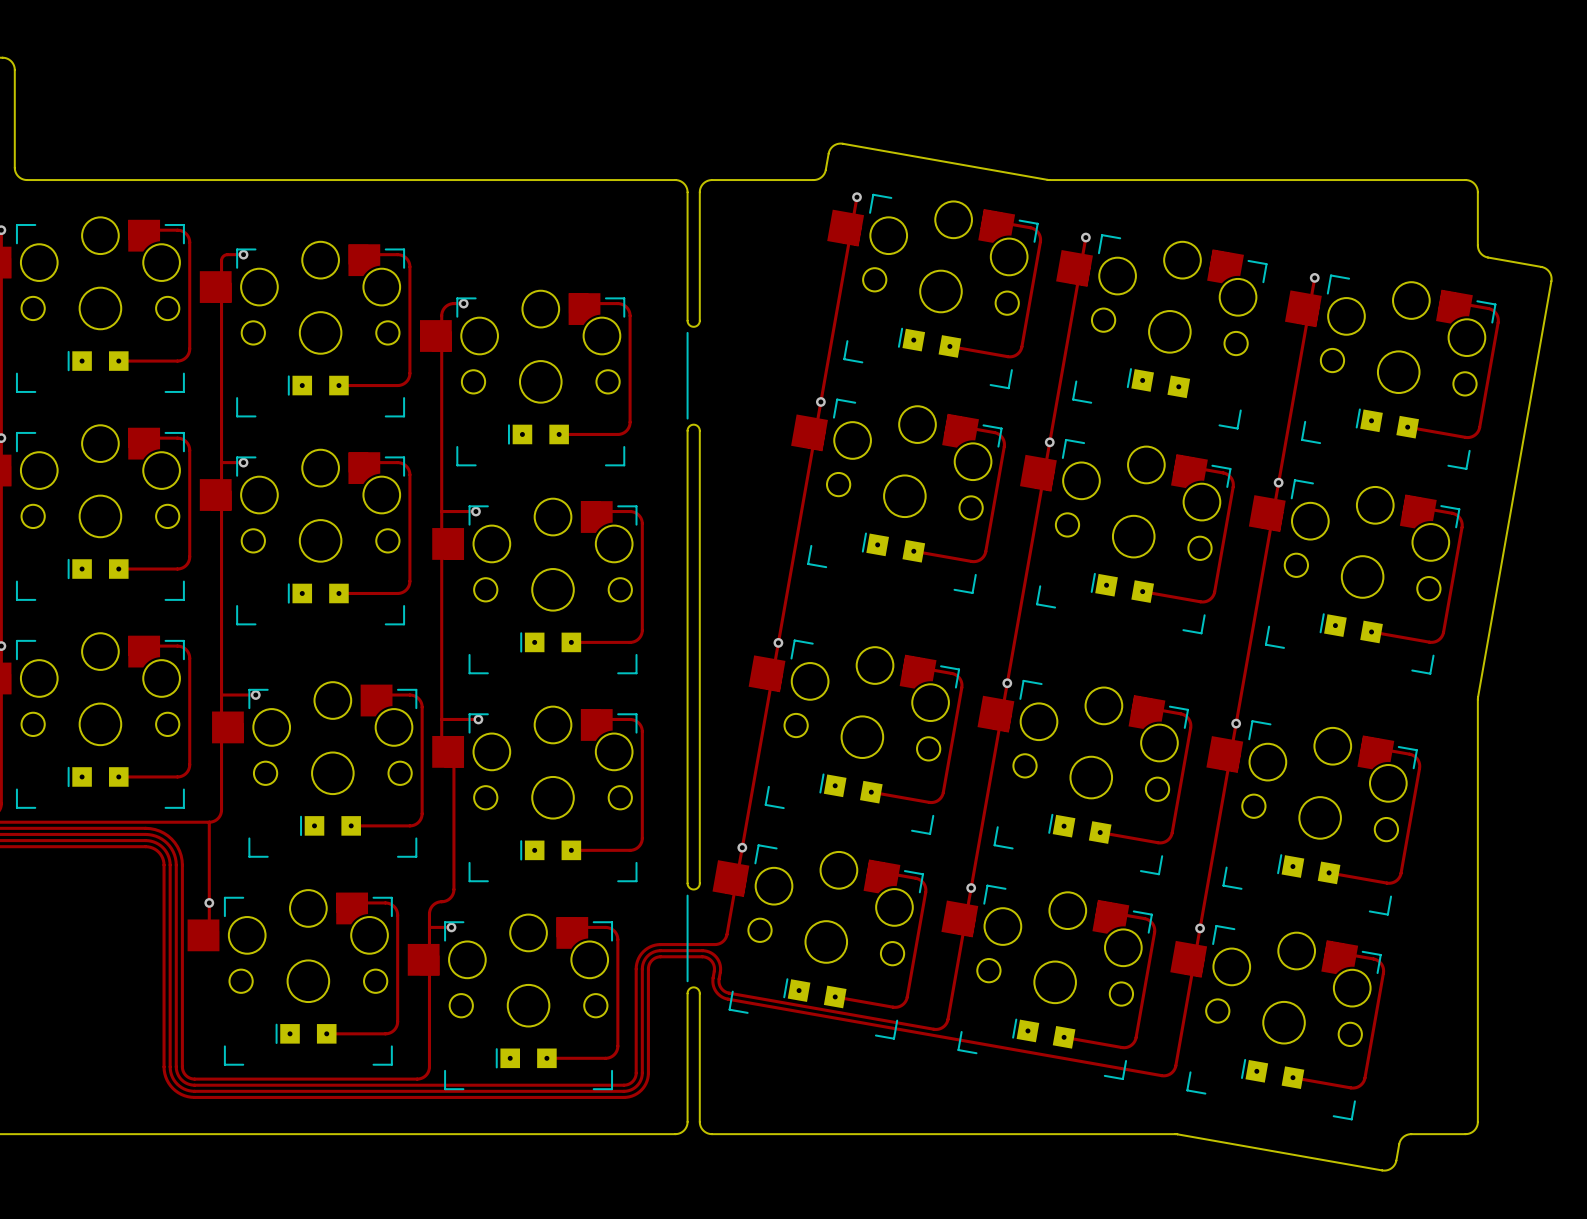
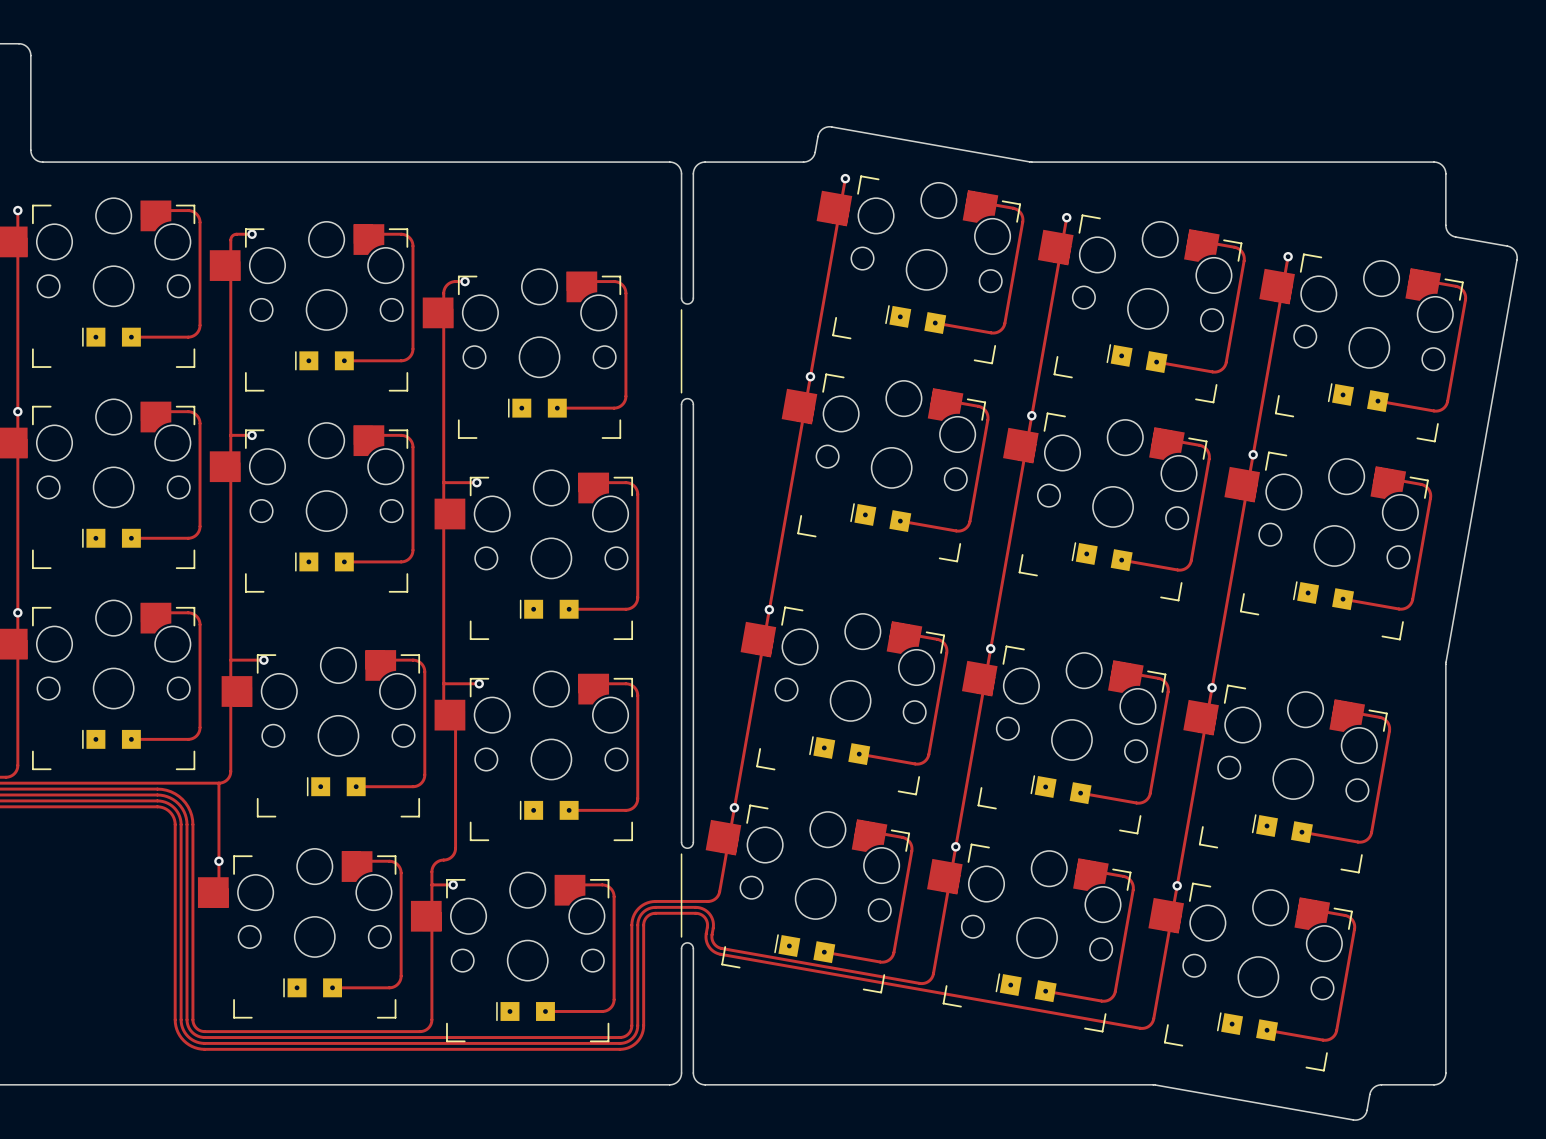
track: none -> (1197, 240) (1235, 247) (1243, 255) (1225, 363) (1221, 369) (1213, 372) (1156, 362)

